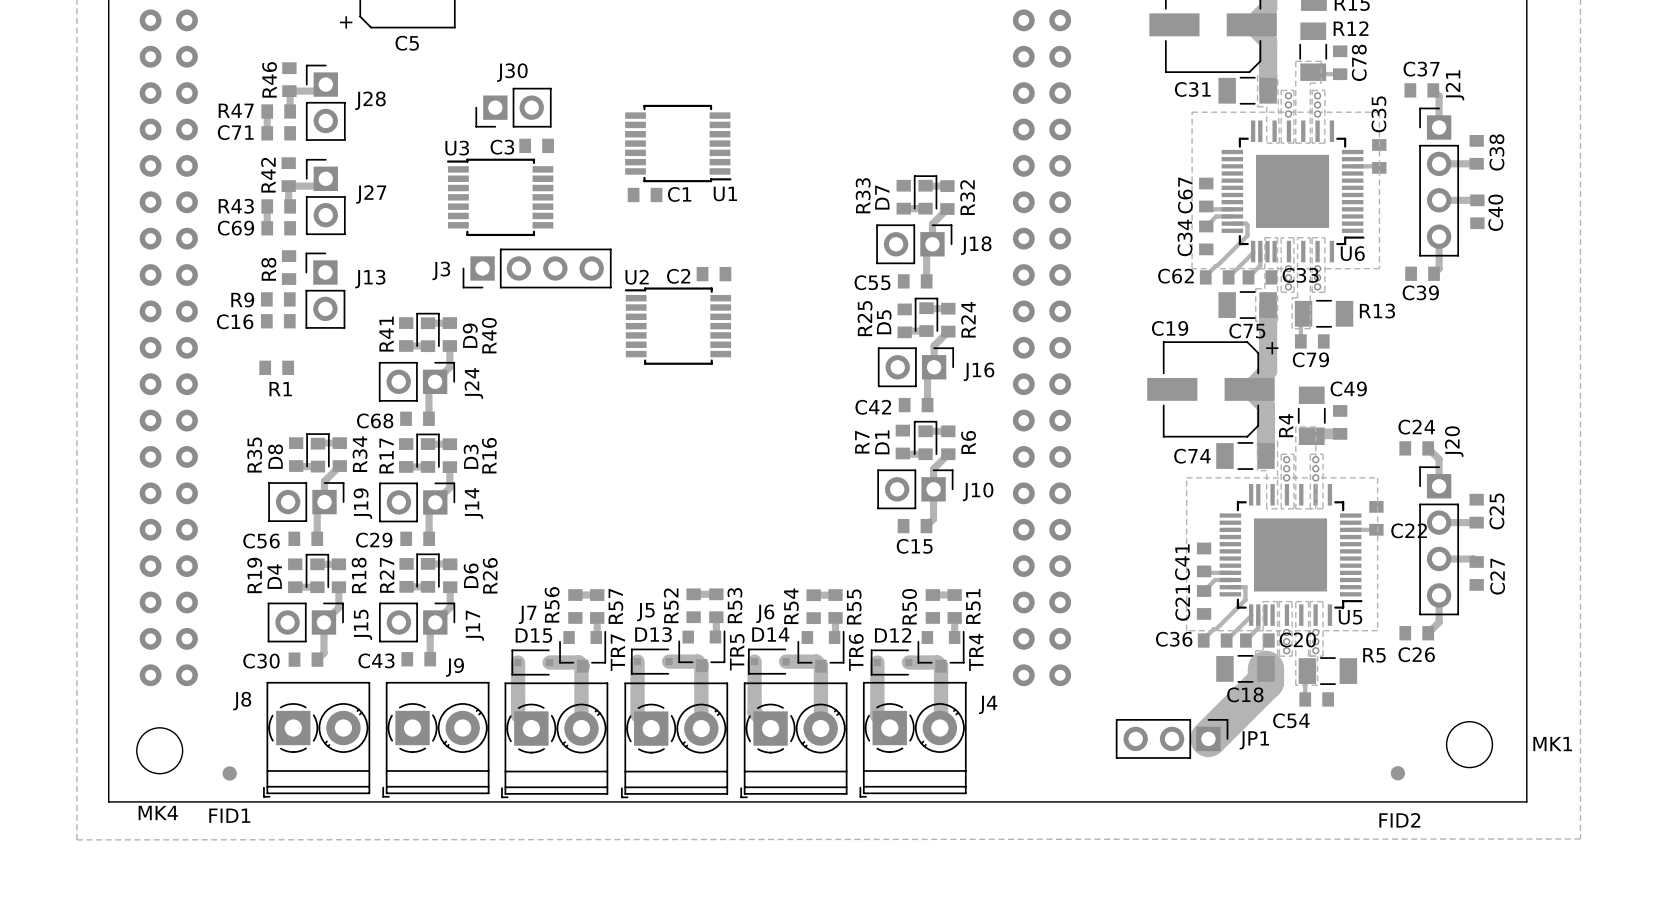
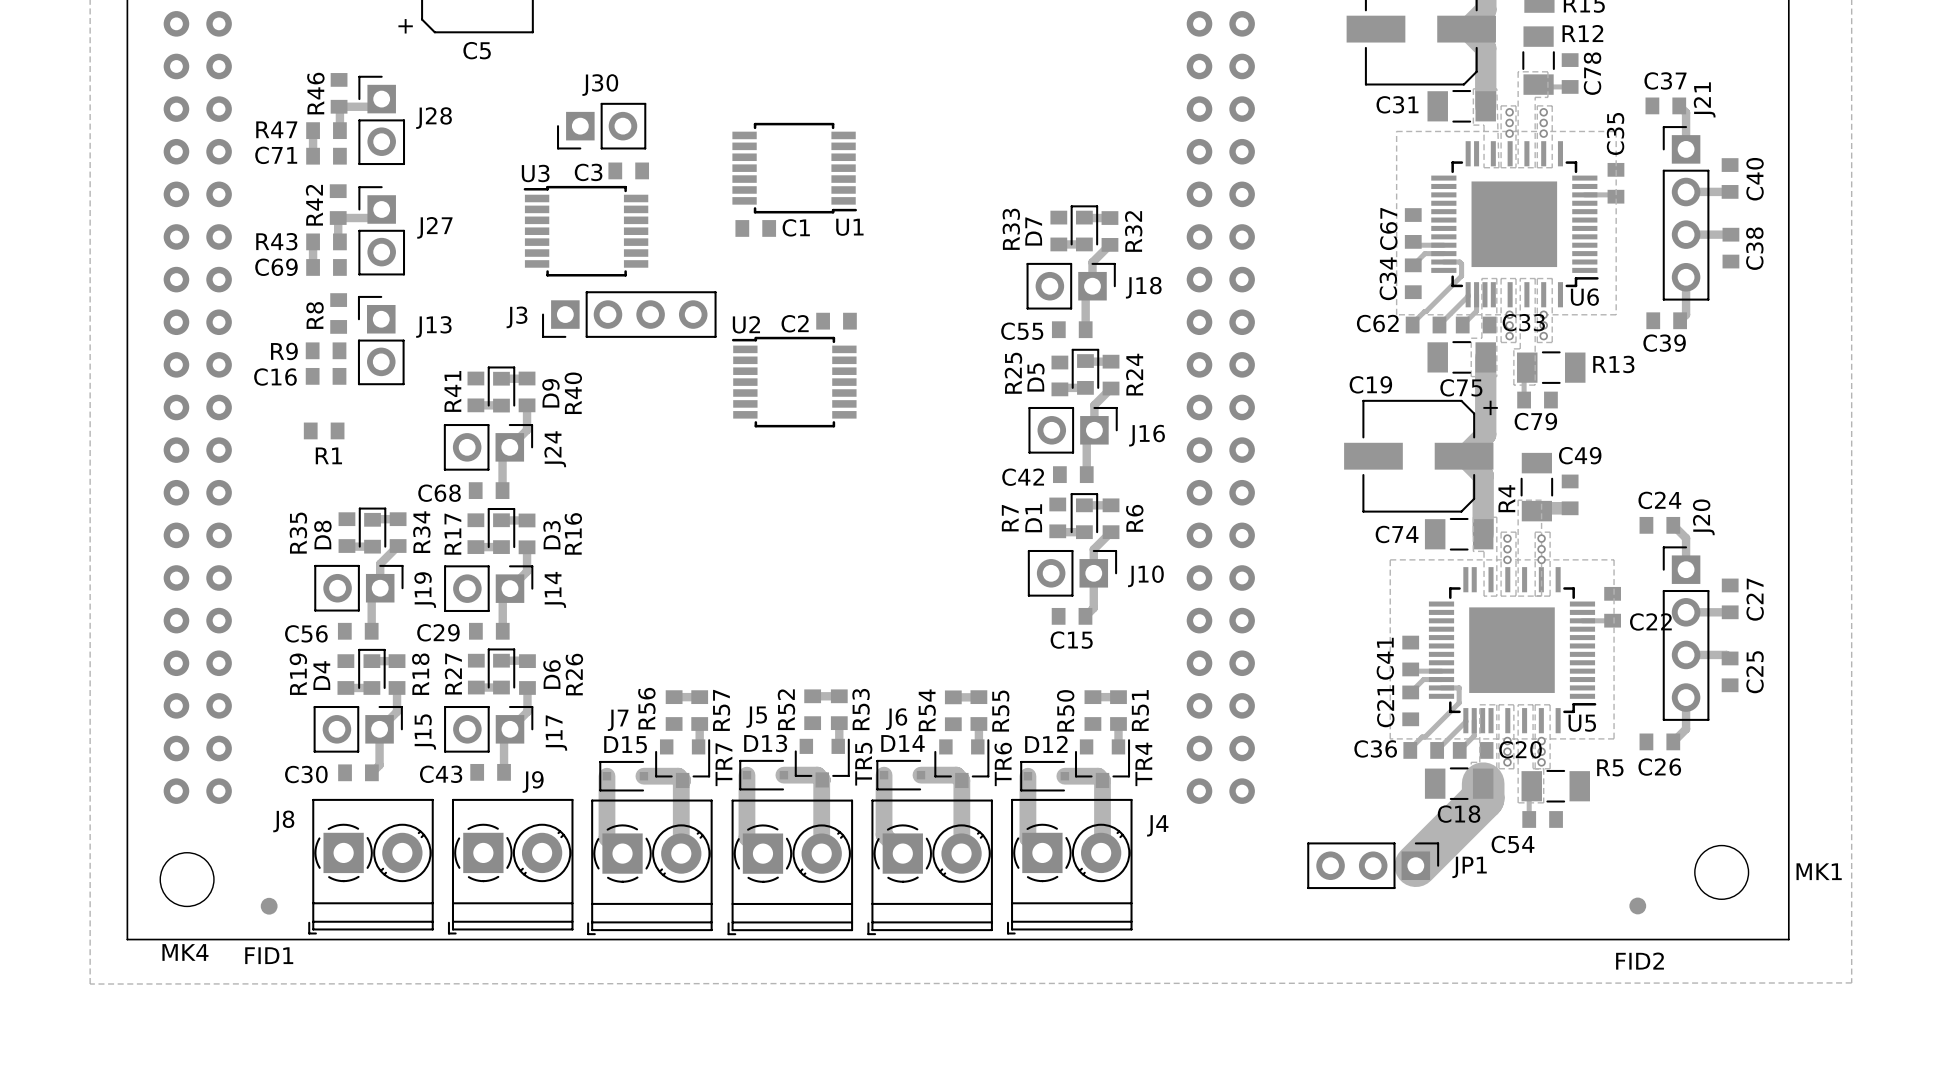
C38 name: C38 (1496, 152) -> C40 (1755, 179)
C40 name: C40 (1495, 212) -> C38 (1754, 248)
C25 name: C25 (1496, 511) -> C27 (1755, 599)
C27 name: C27 (1497, 576) -> C25 (1755, 672)

